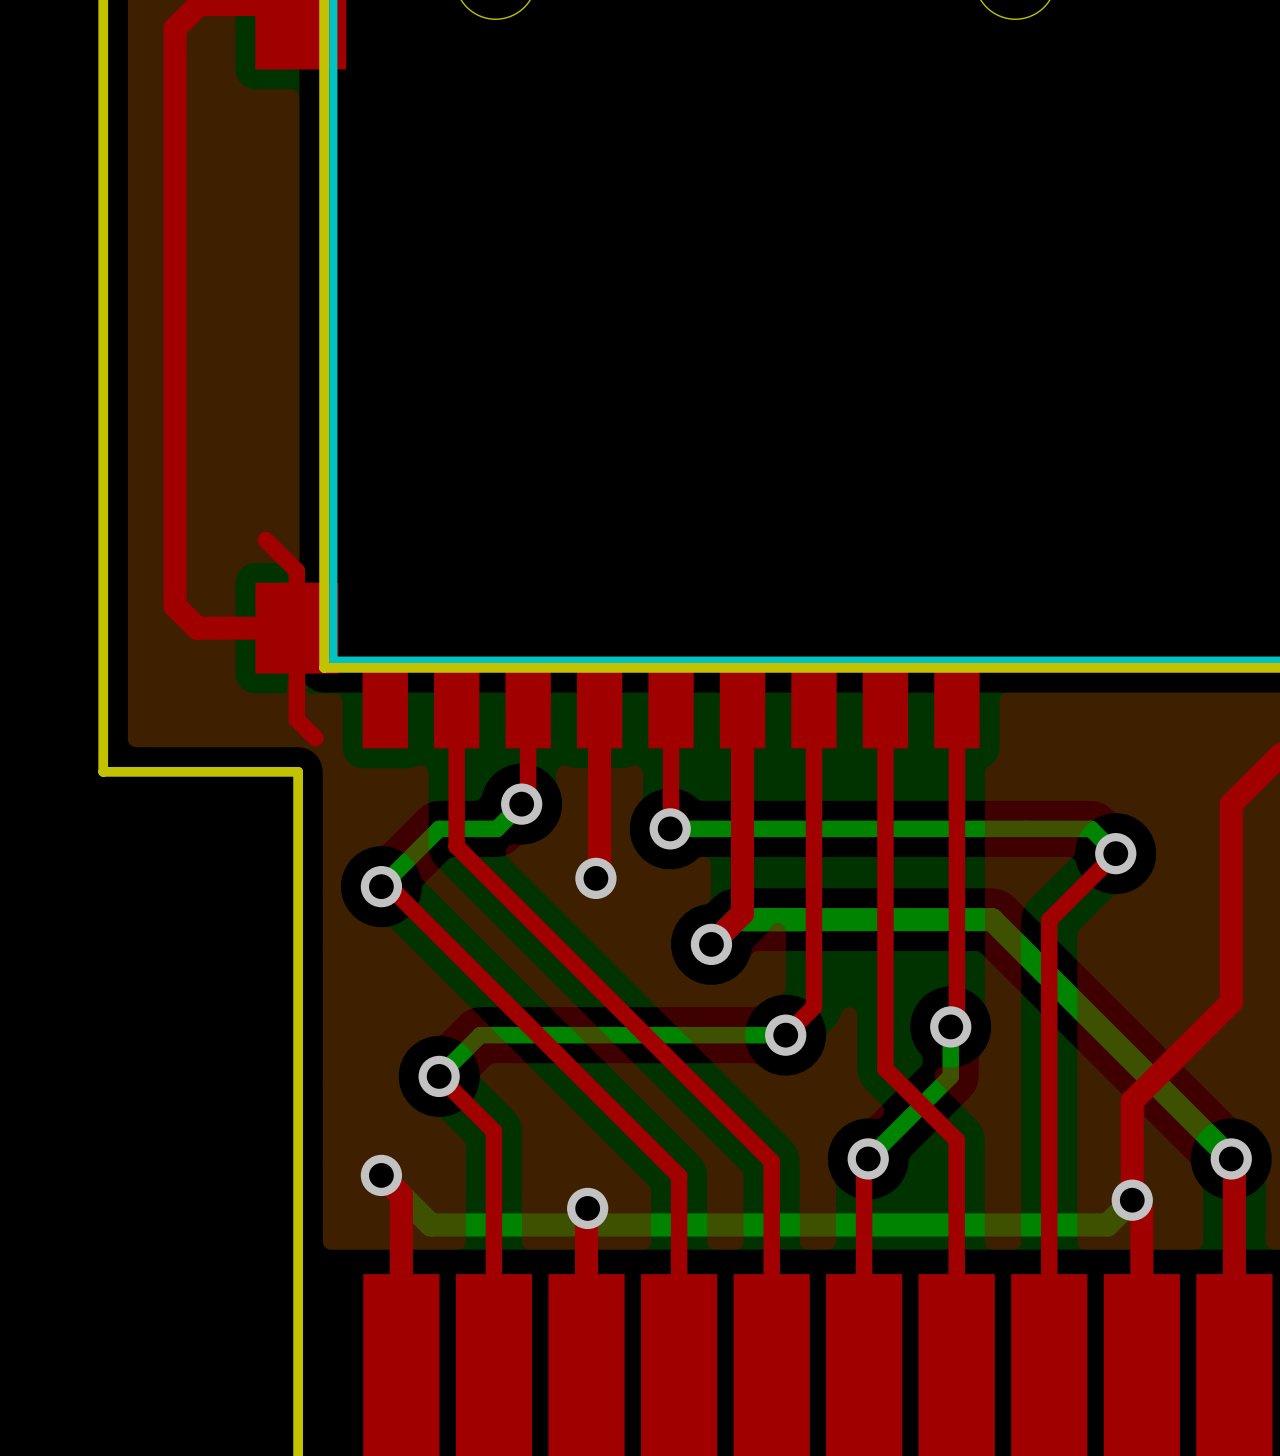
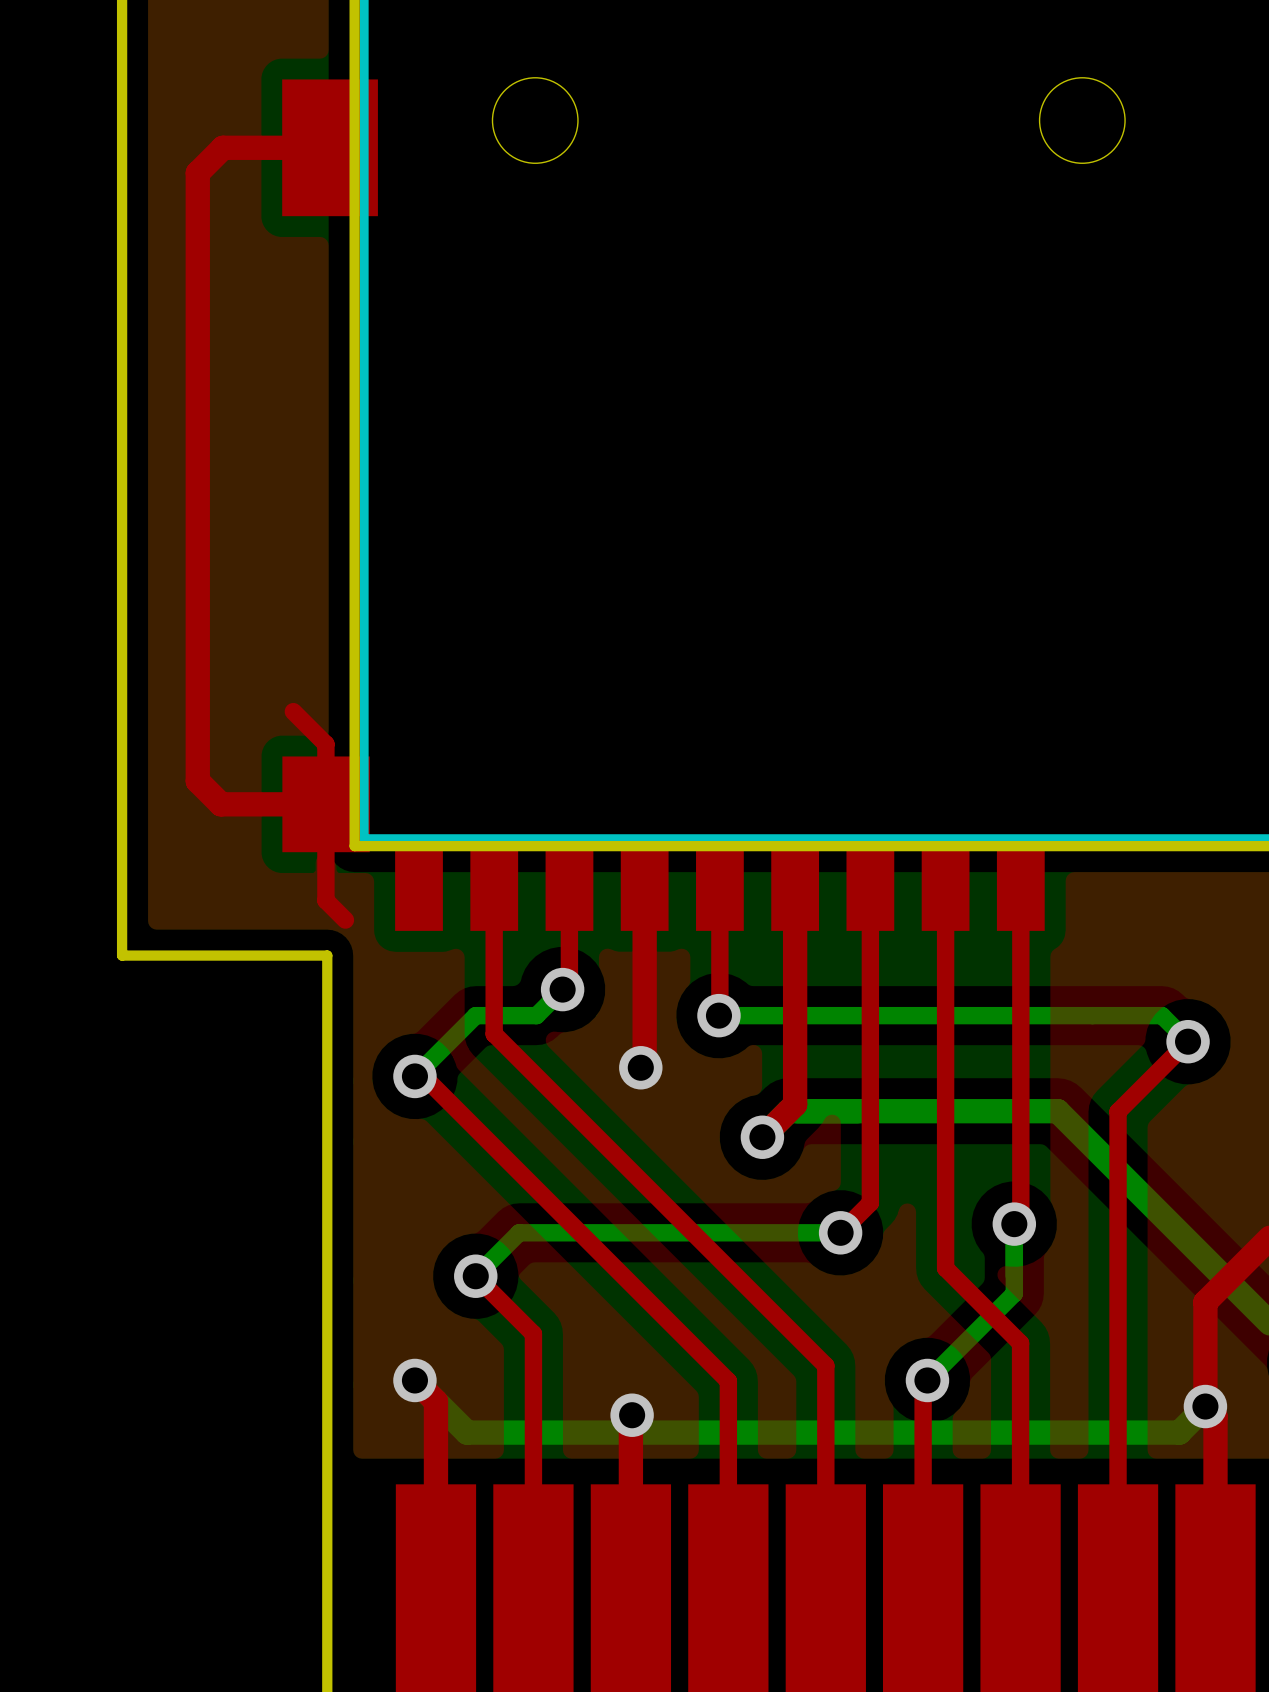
bottom track: (950, 1076) (868, 1158) -> (1014, 1276) (1014, 1293) (927, 1380)
via position: (868, 1158) -> (927, 1380)

